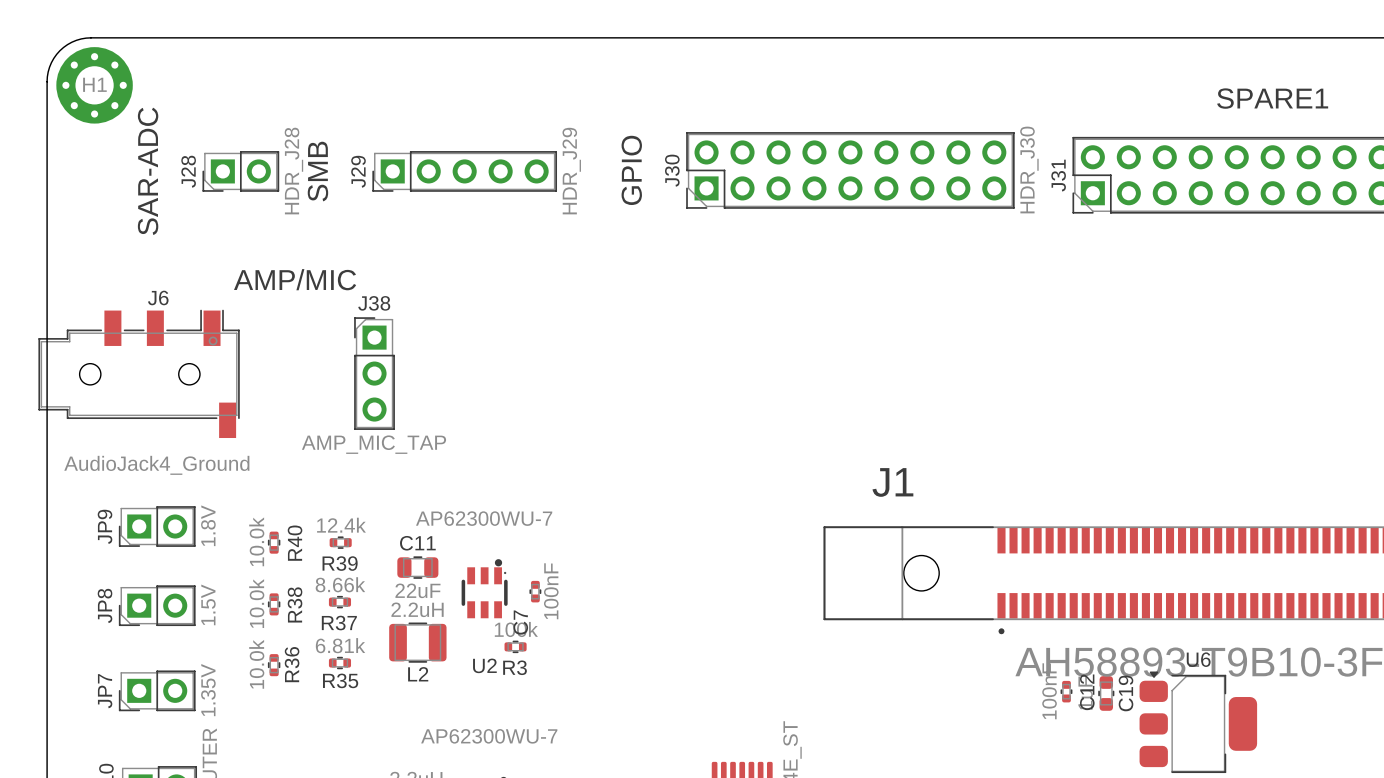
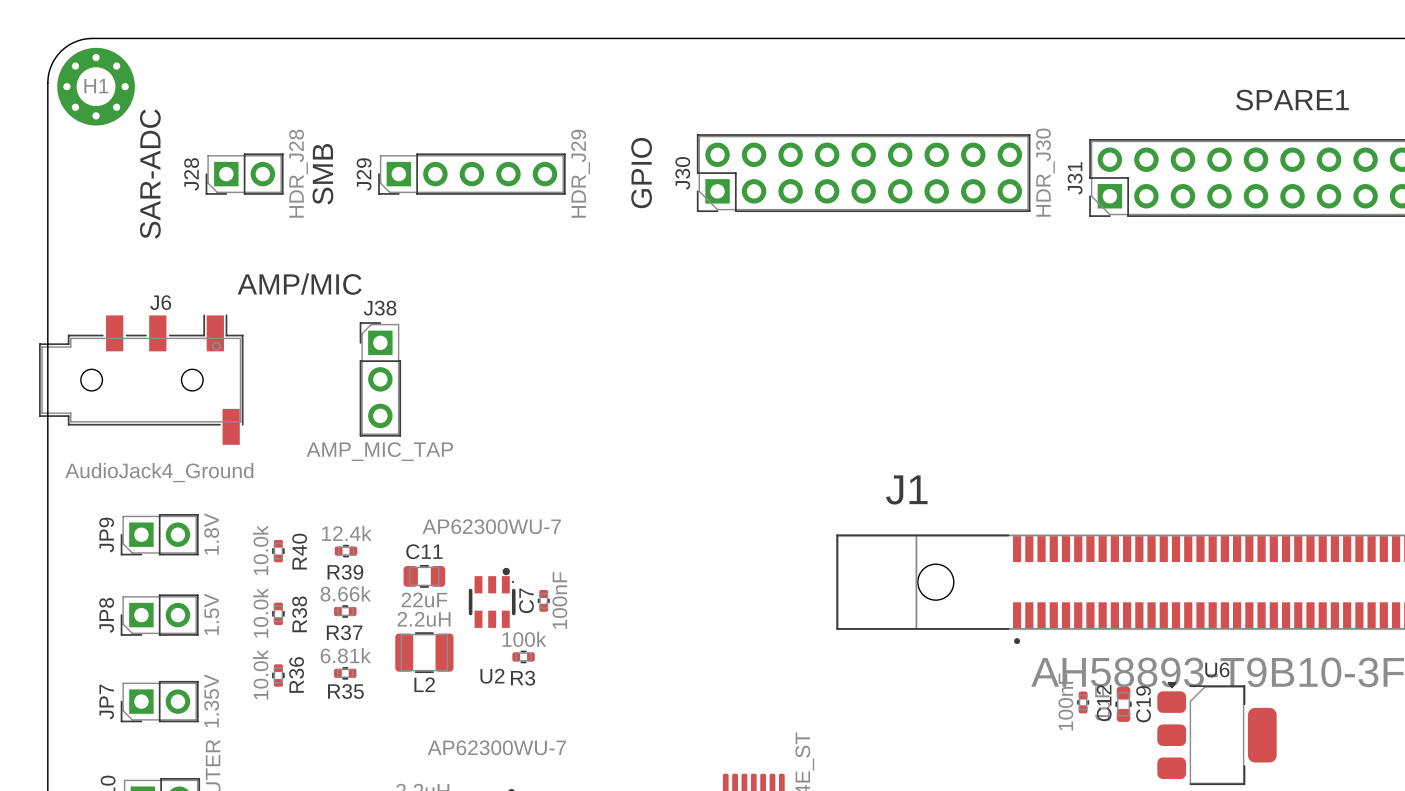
C7 name position: C7 (520, 622) -> C7 (526, 600)

